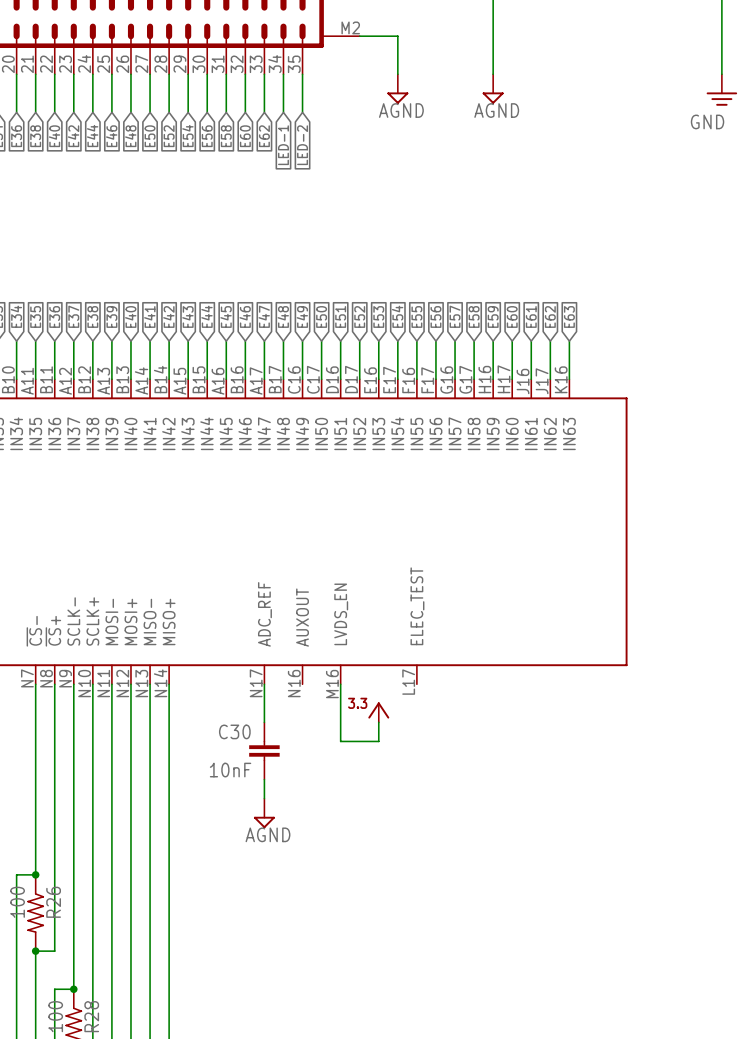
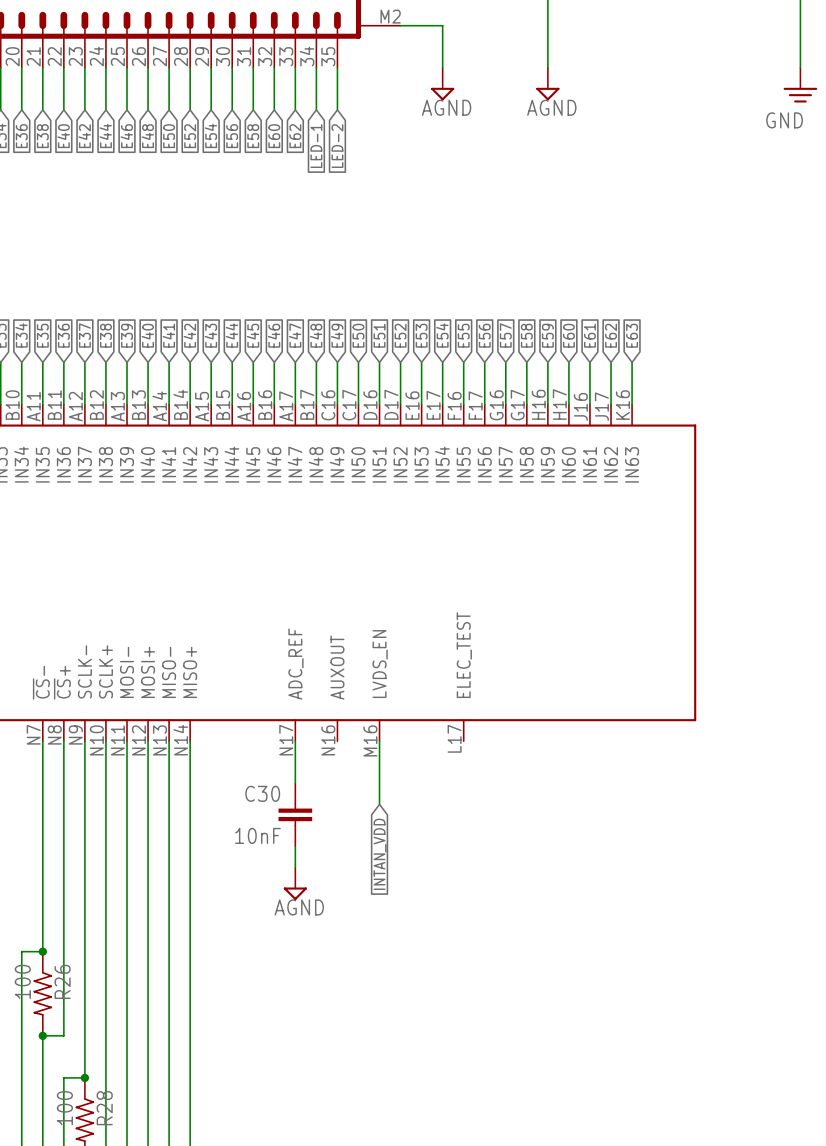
power symbol: (378, 712) -> none
wire: (378, 722) (378, 741) (340, 741) -> none
global label: none -> INTAN_VDD (380, 854)

